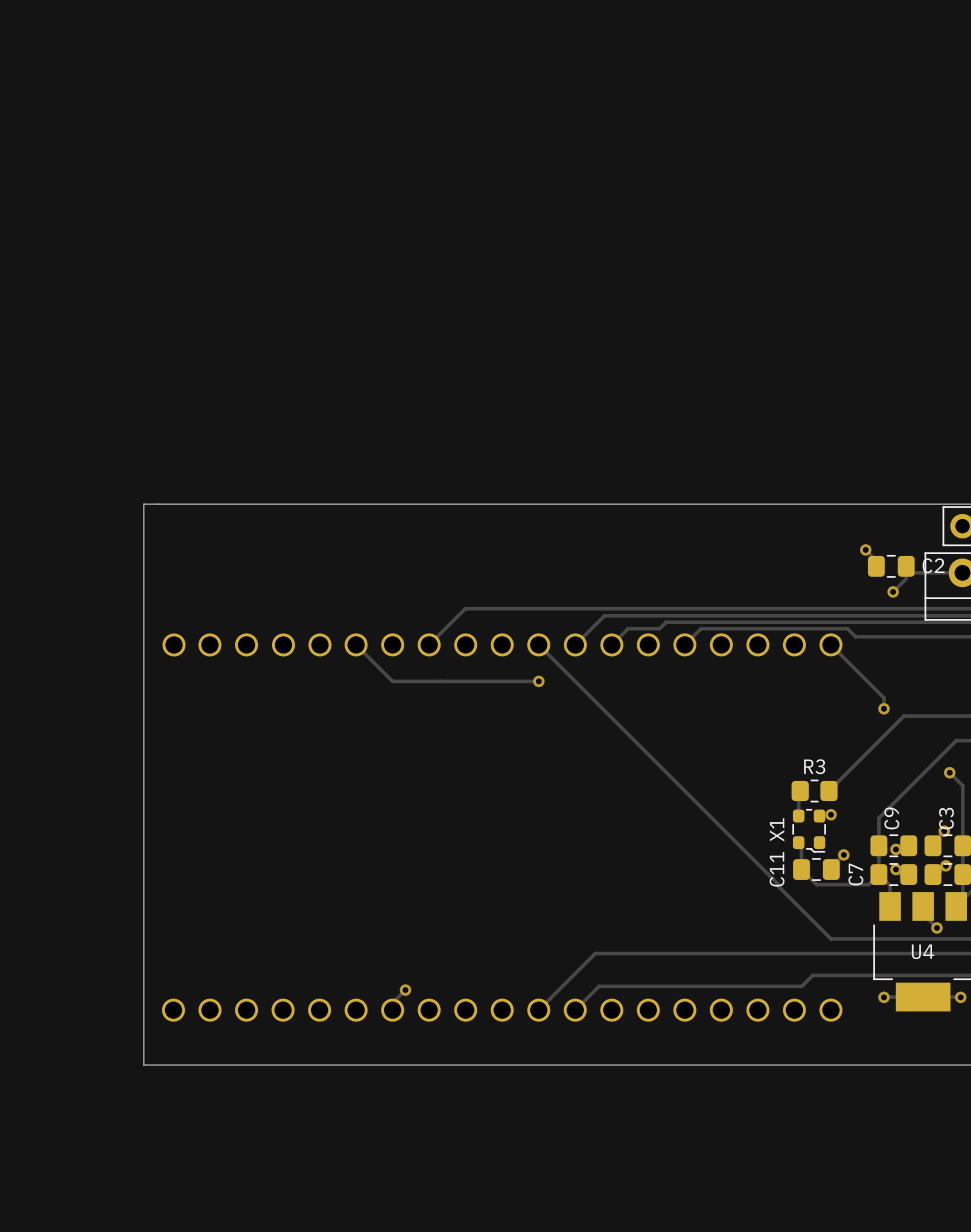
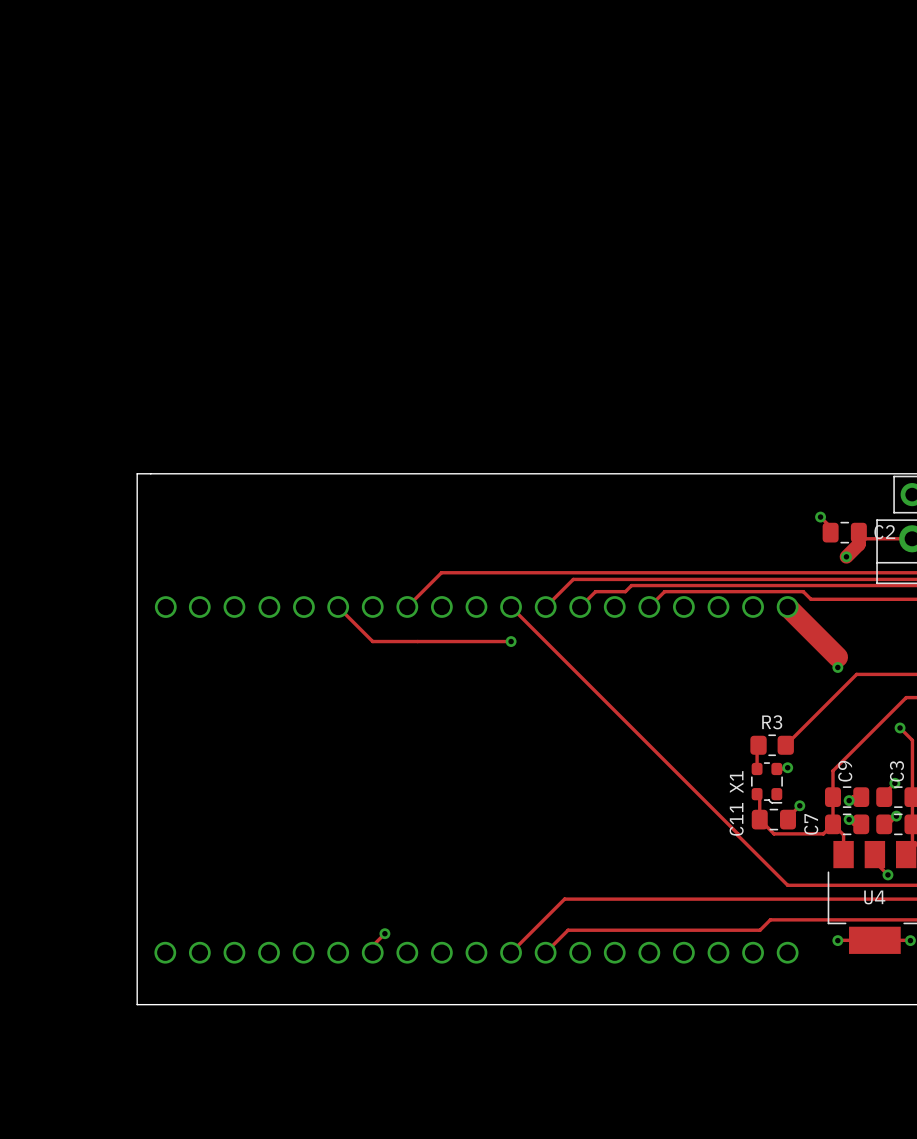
track width: thin (906, 566) (906, 578) (893, 591) -> thick (858, 532) (858, 544) (846, 556)
track width: thin (830, 644) (883, 697) -> thick (787, 606) (837, 657)

